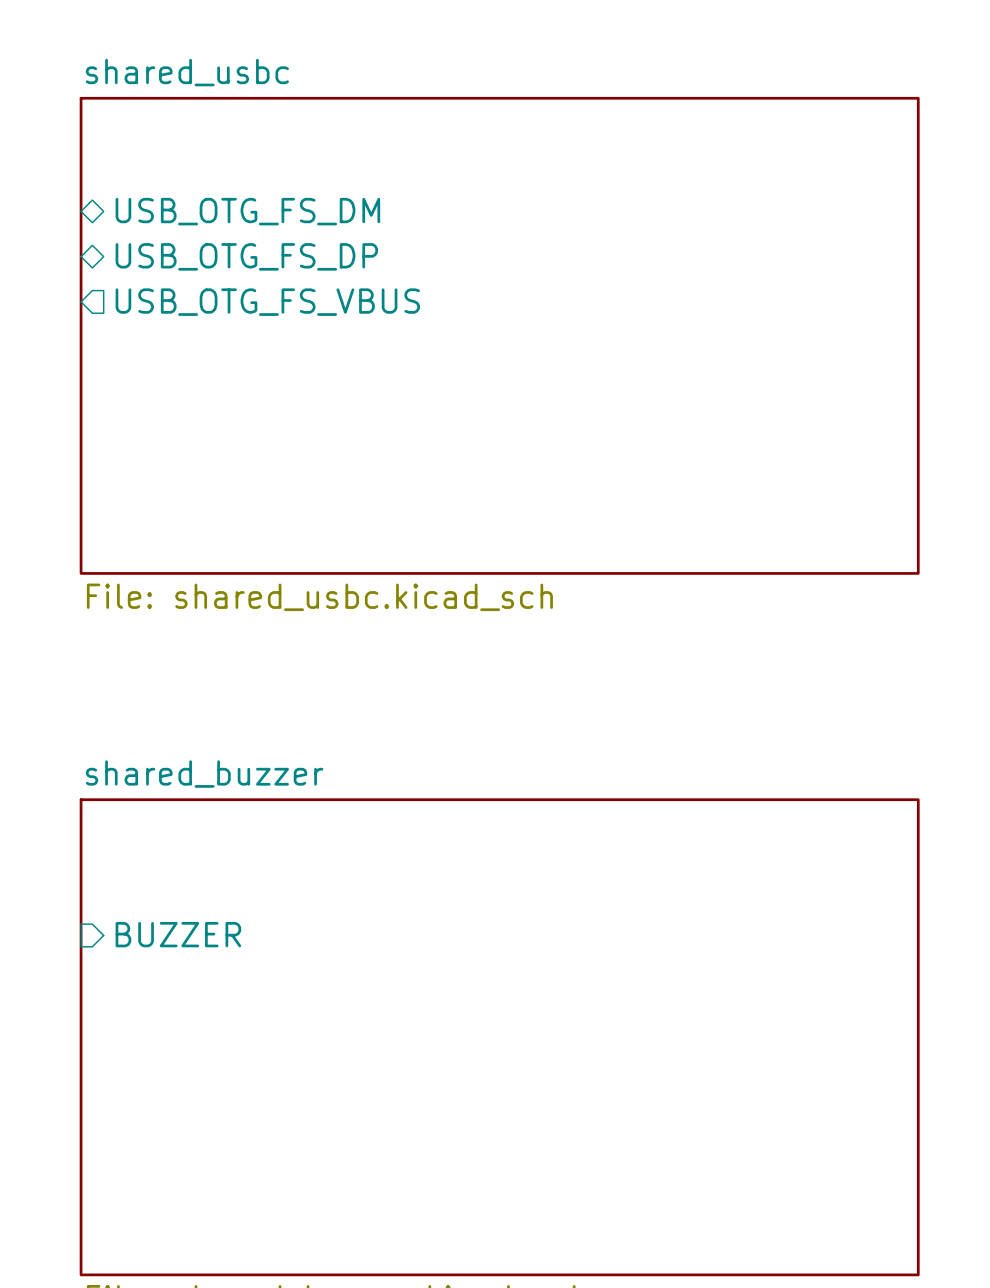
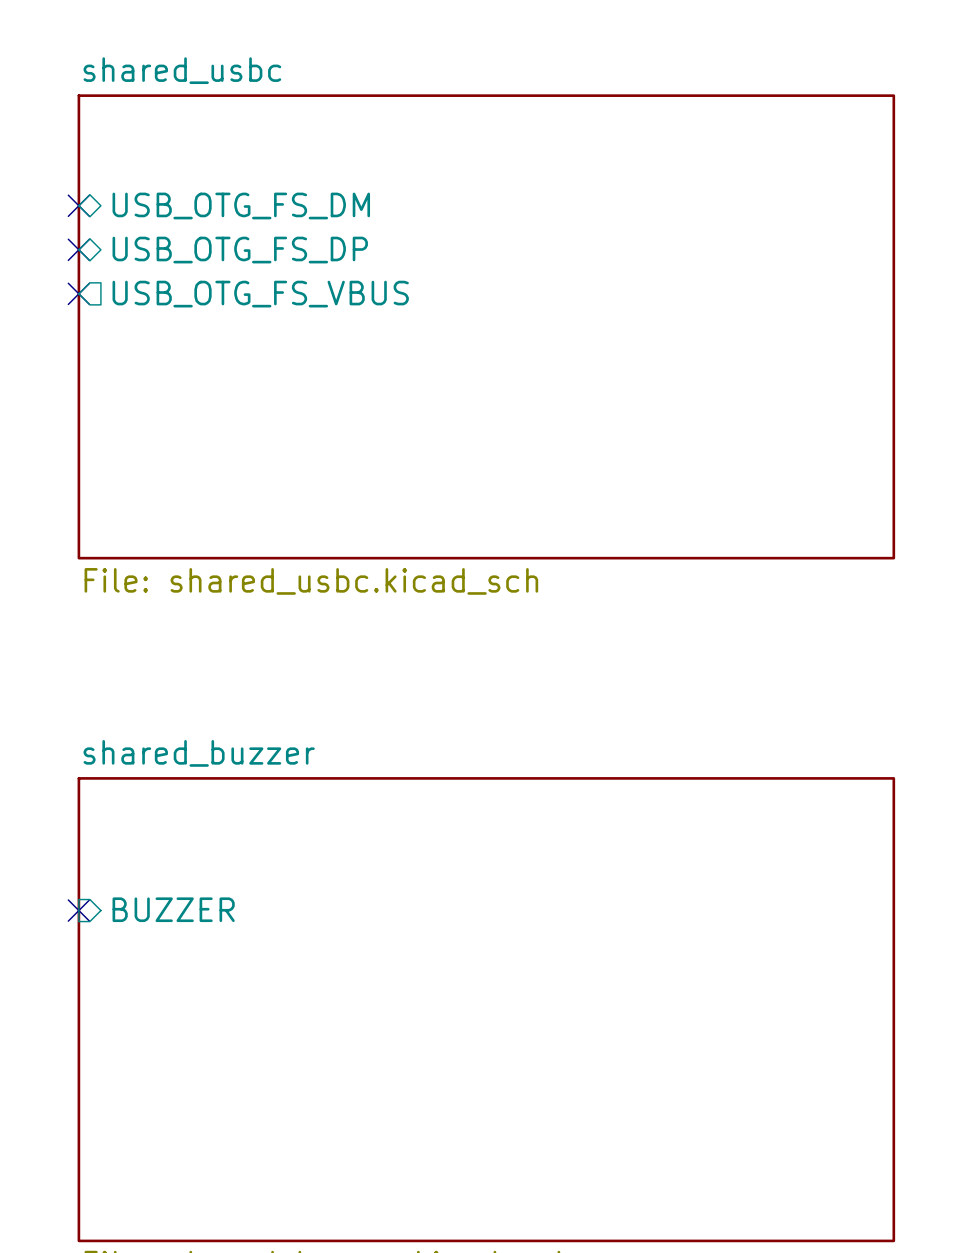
no-connect mark: none -> (78, 205)
no-connect mark: none -> (78, 249)
no-connect mark: none -> (78, 293)
no-connect mark: none -> (78, 910)

